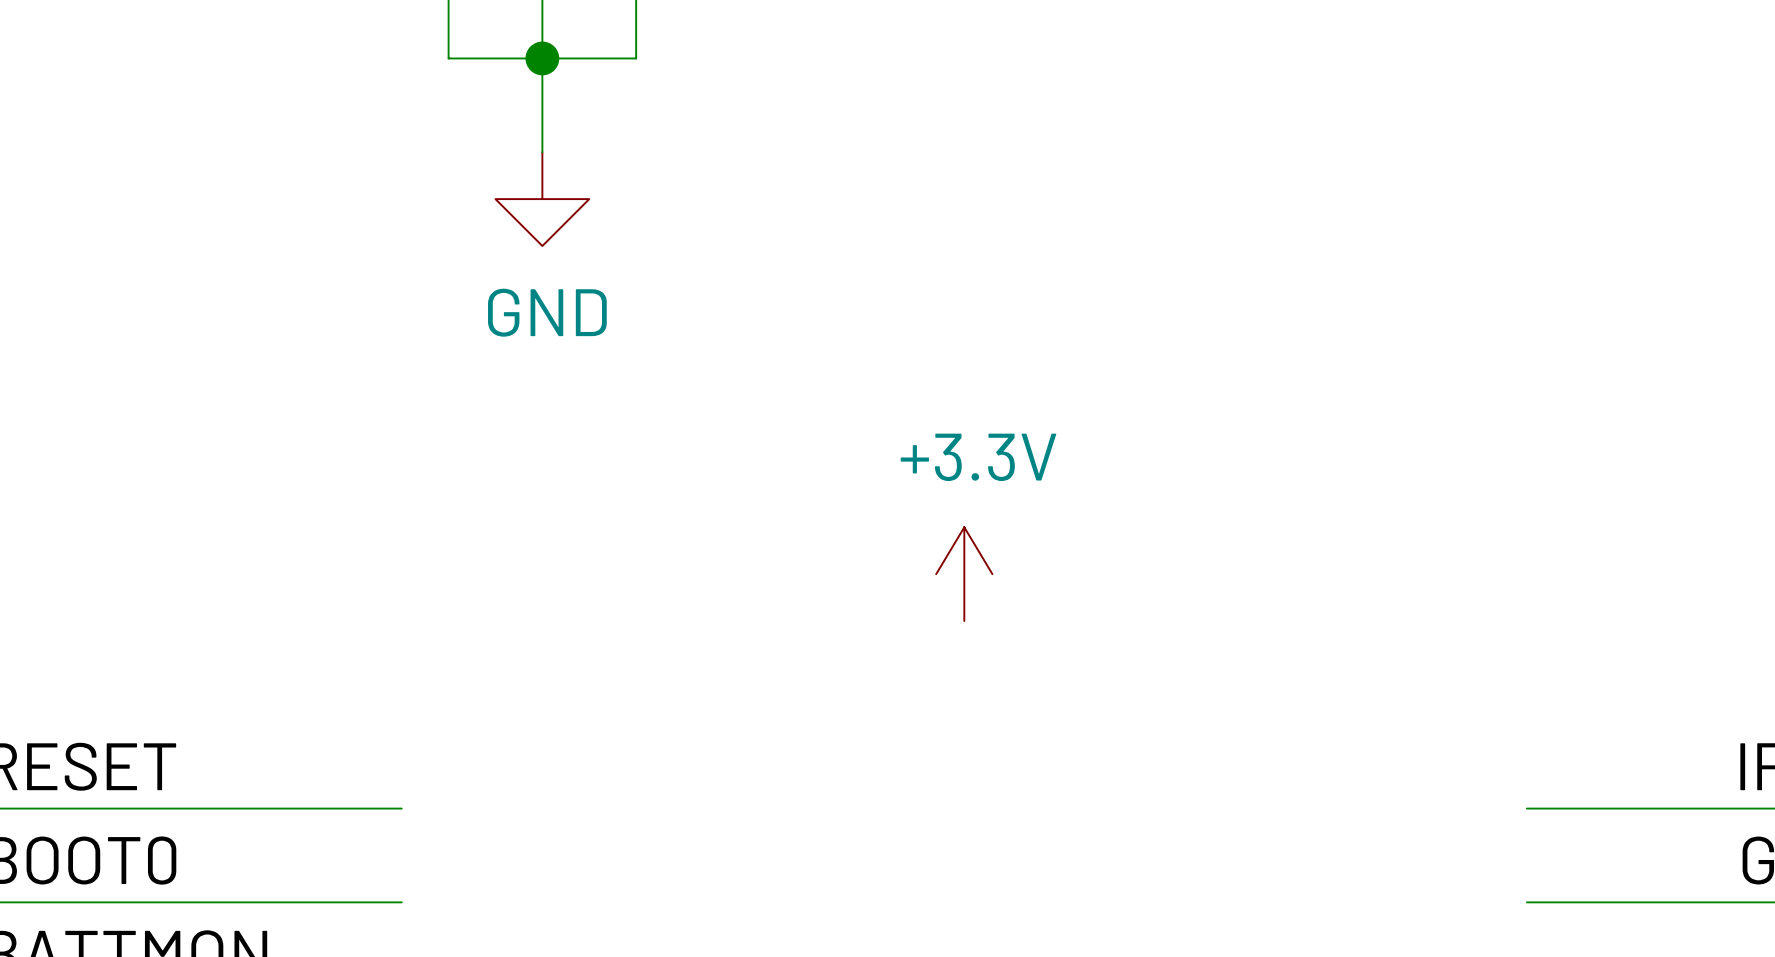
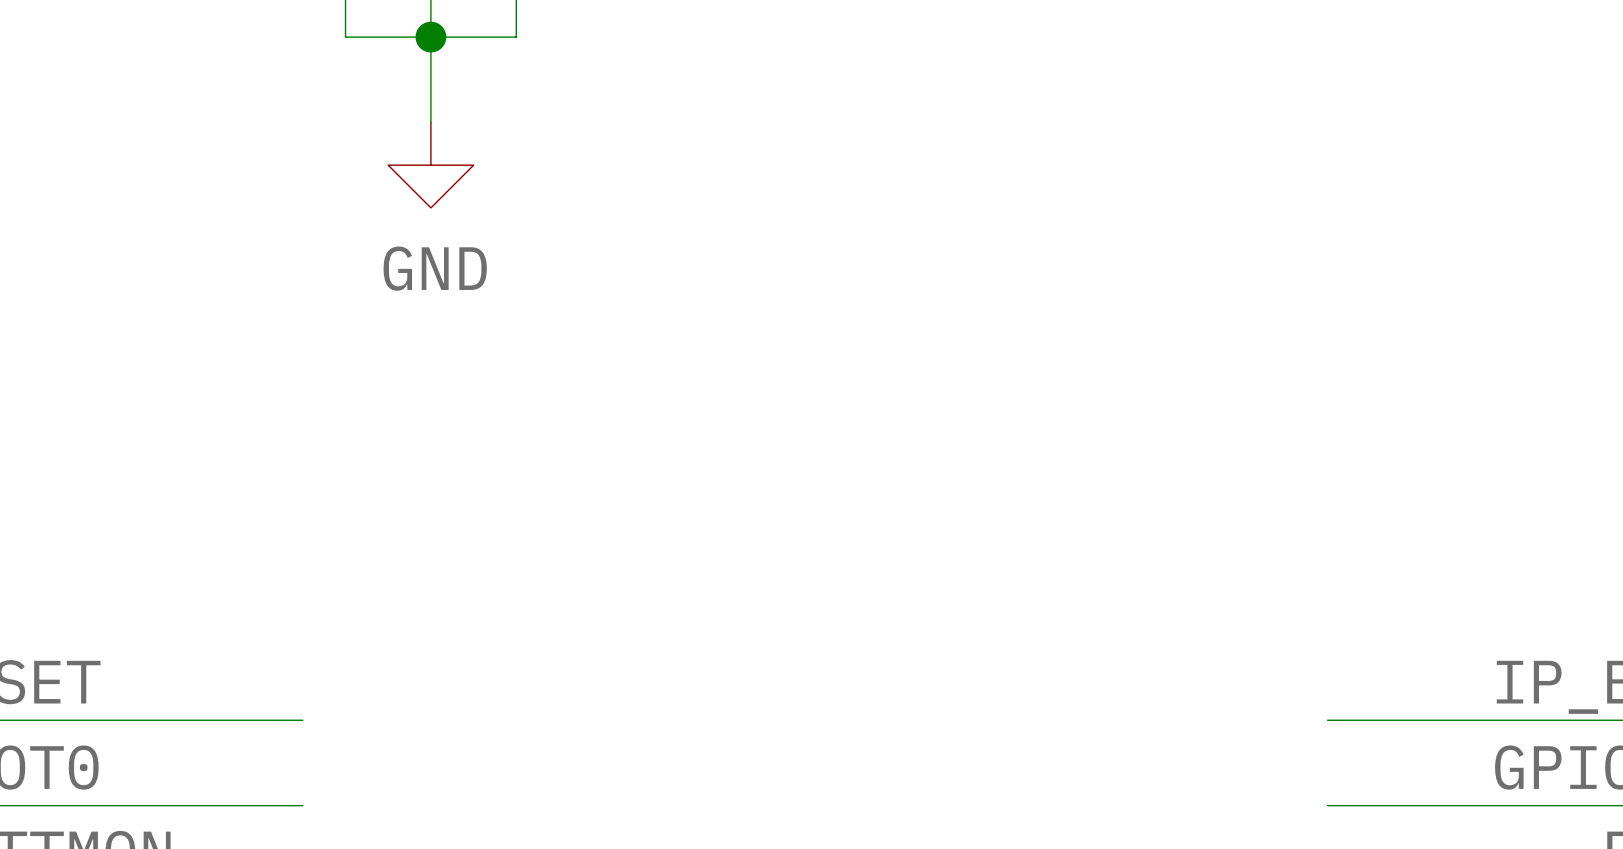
power symbol: +3.3V (964, 574) -> none

